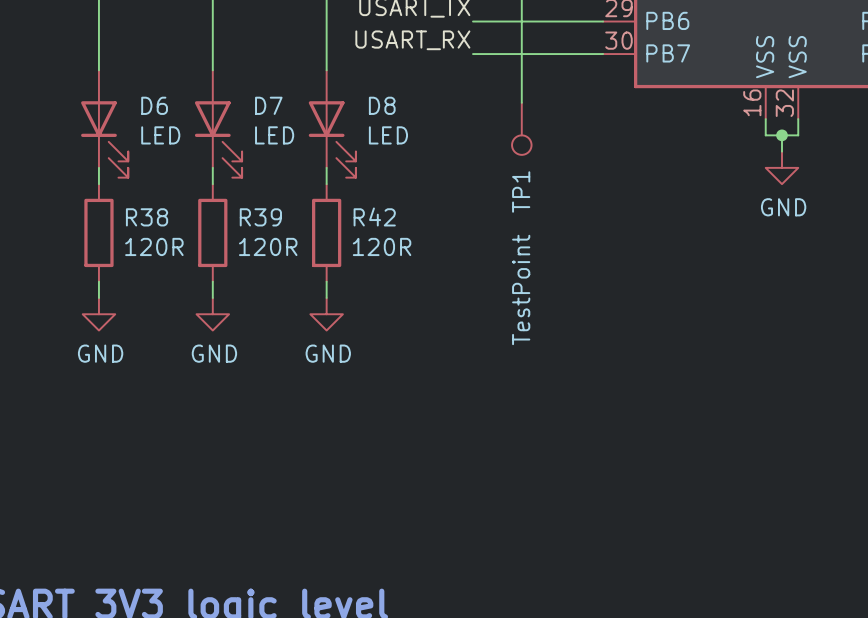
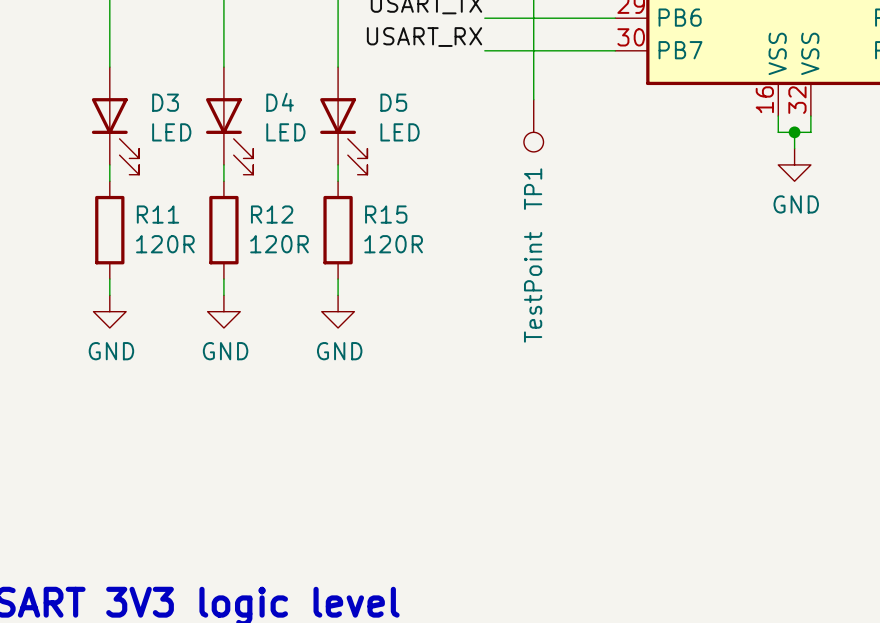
D6 name: D6 (154, 105) -> D3 (165, 102)
D7 name: D7 (268, 105) -> D4 (280, 102)
D8 name: D8 (382, 105) -> D5 (393, 102)
R42 name: R42 (374, 216) -> R15 (386, 214)
R38 name: R38 (147, 217) -> R11 (157, 214)
R39 name: R39 (260, 217) -> R12 (272, 214)

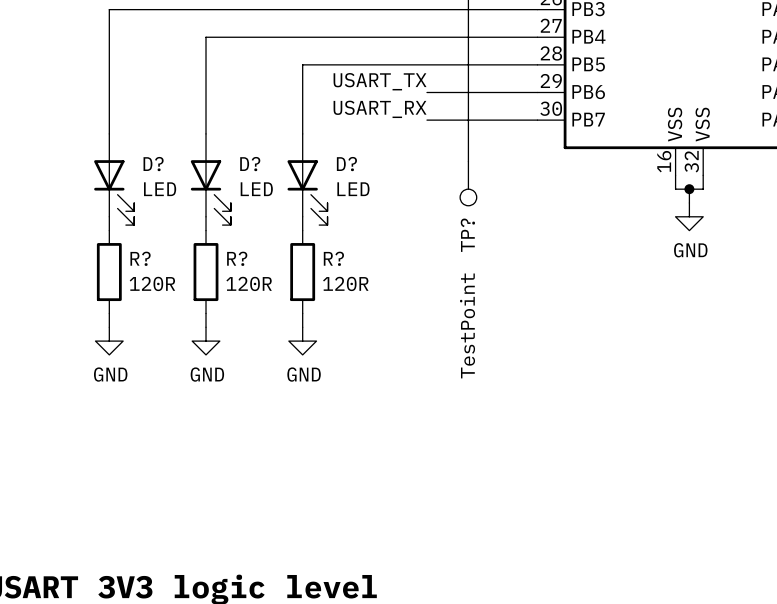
D3 name: D3 (165, 102) -> D? (153, 164)
D4 name: D4 (280, 102) -> D? (250, 164)
D5 name: D5 (393, 102) -> D? (346, 164)
TP1 name: TP1 (533, 189) -> TP? (467, 235)
R11 name: R11 (157, 214) -> R? (140, 258)
R12 name: R12 (272, 214) -> R? (237, 258)
R15 name: R15 (386, 214) -> R? (333, 258)

